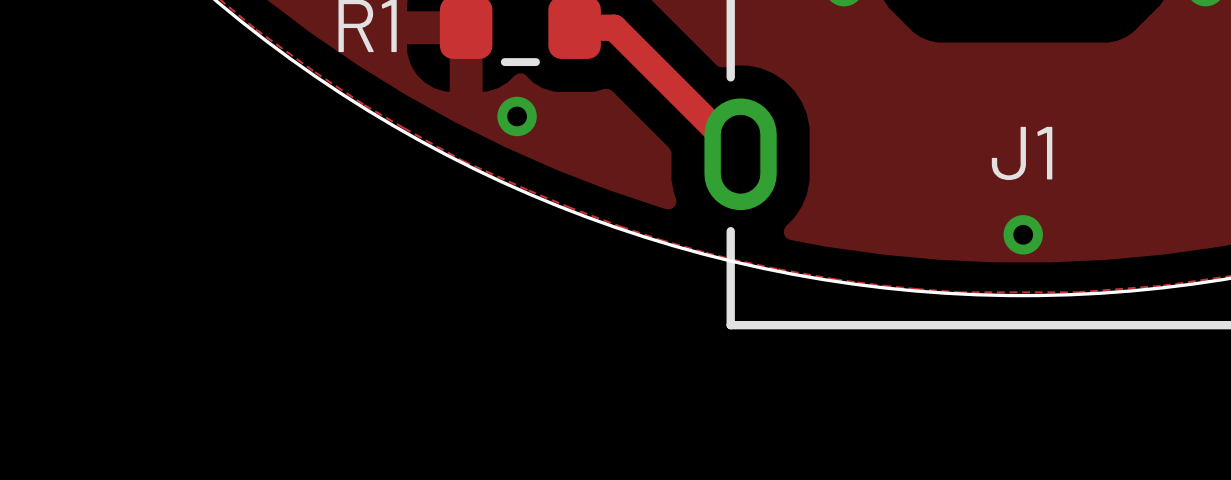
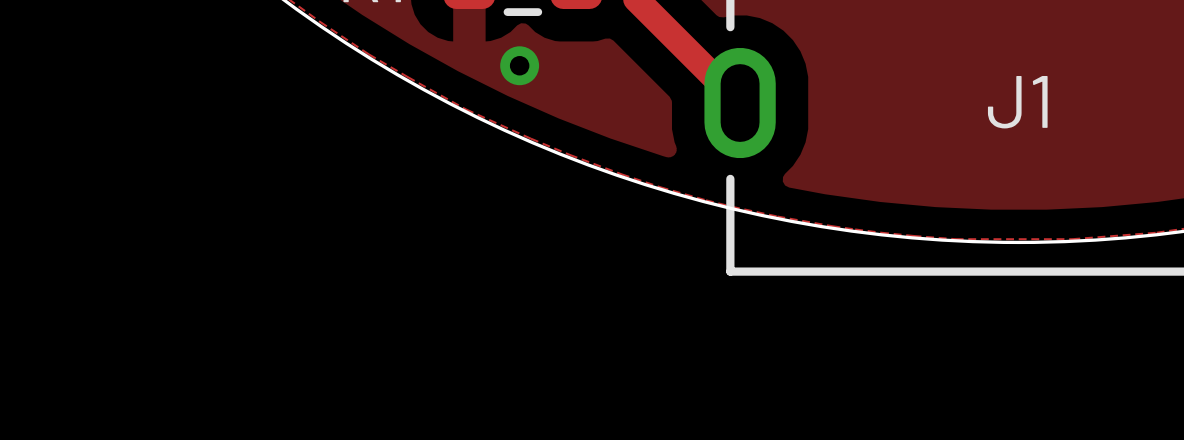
via: (1023, 234) -> none

